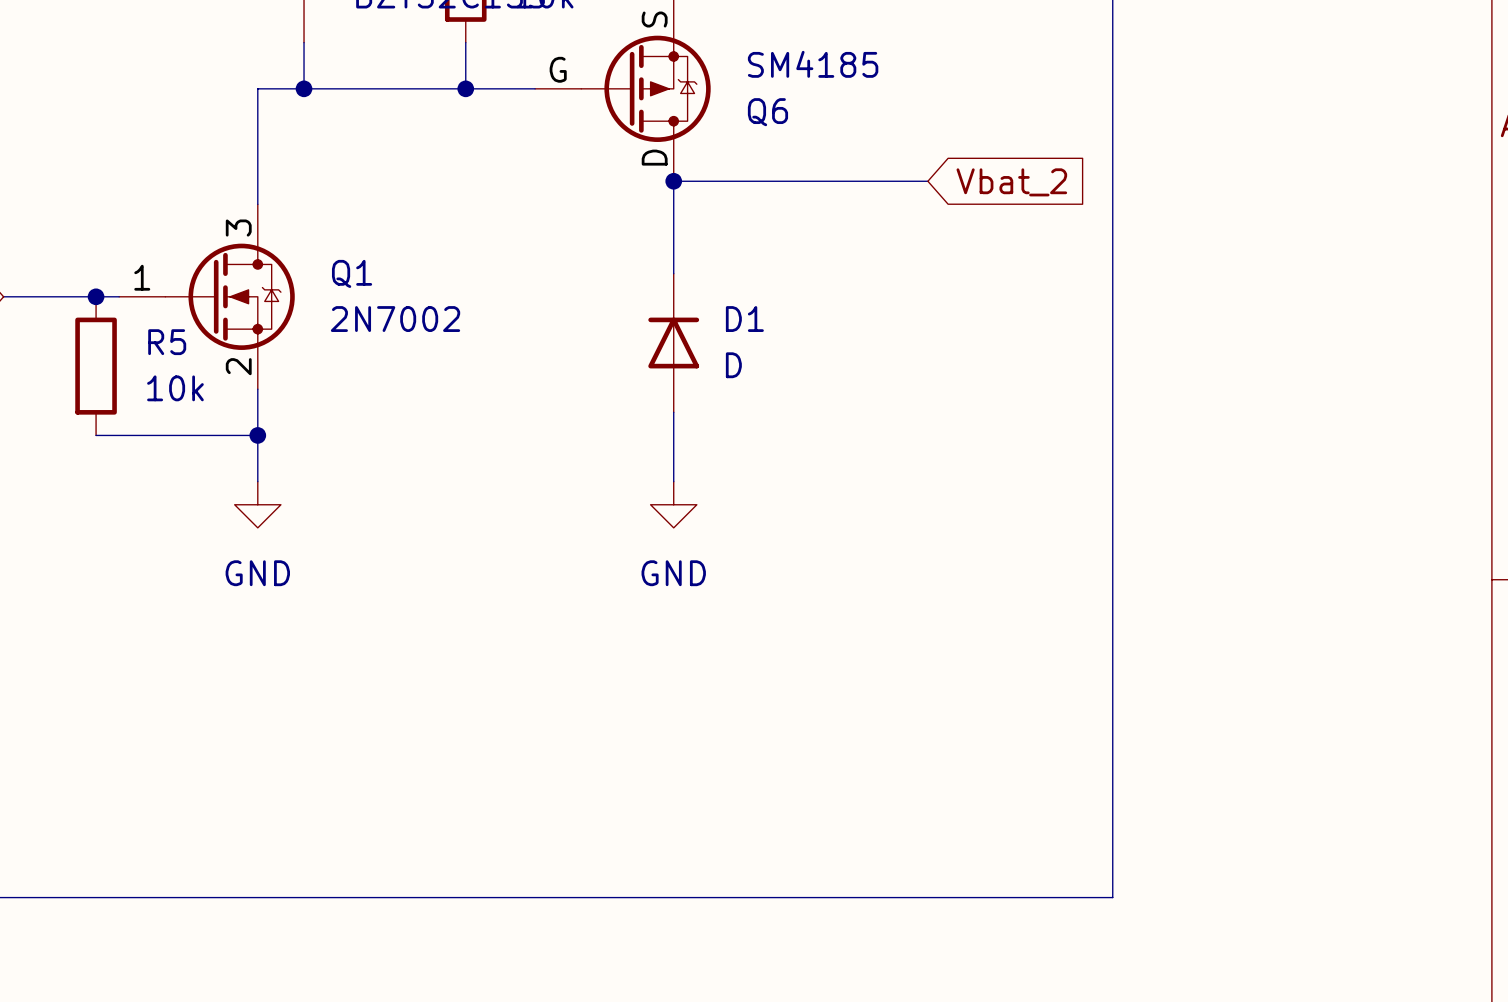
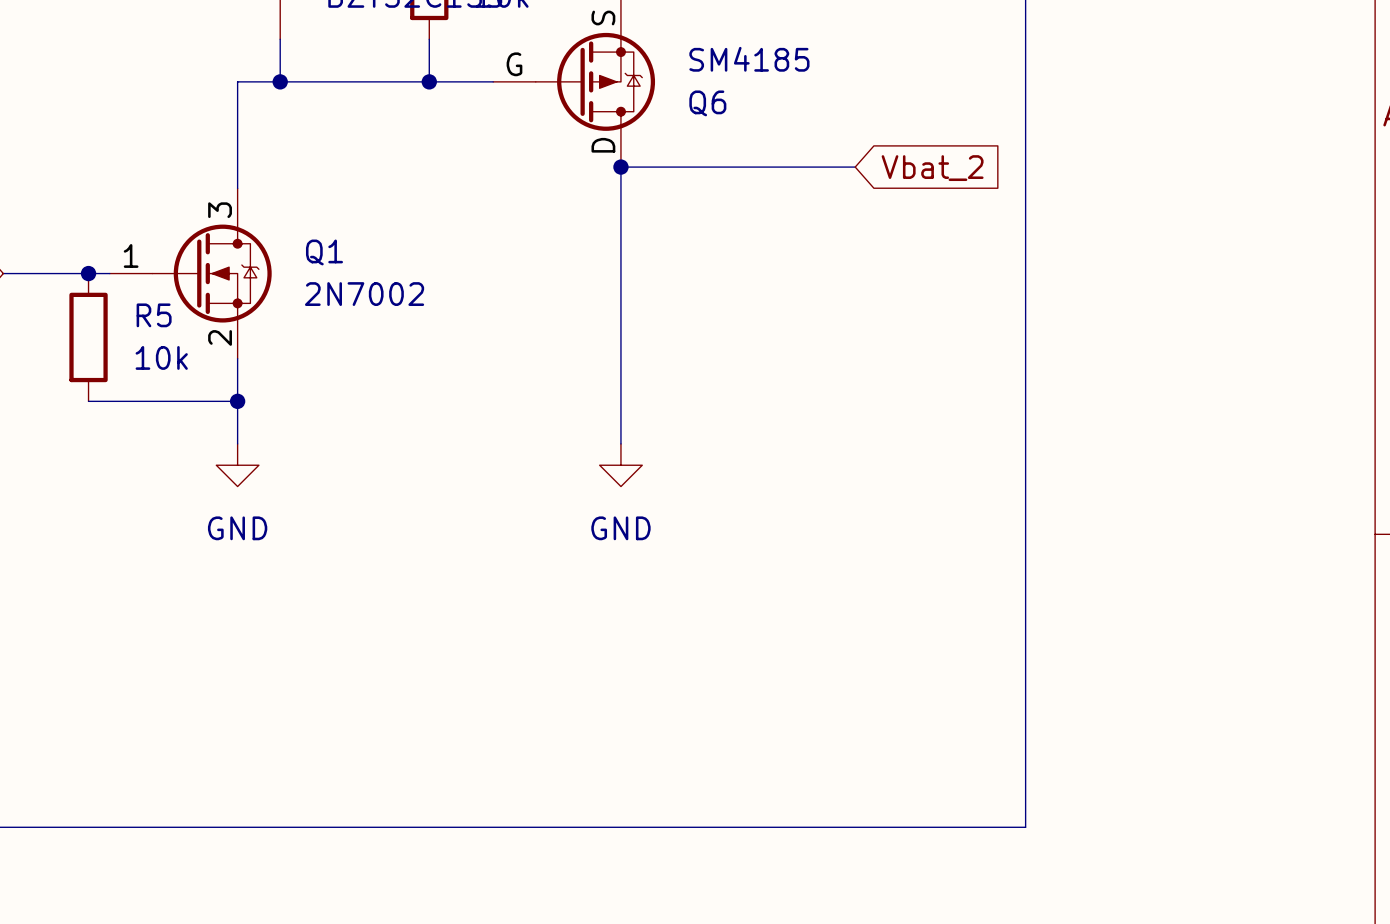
D1: D (673, 343) -> none

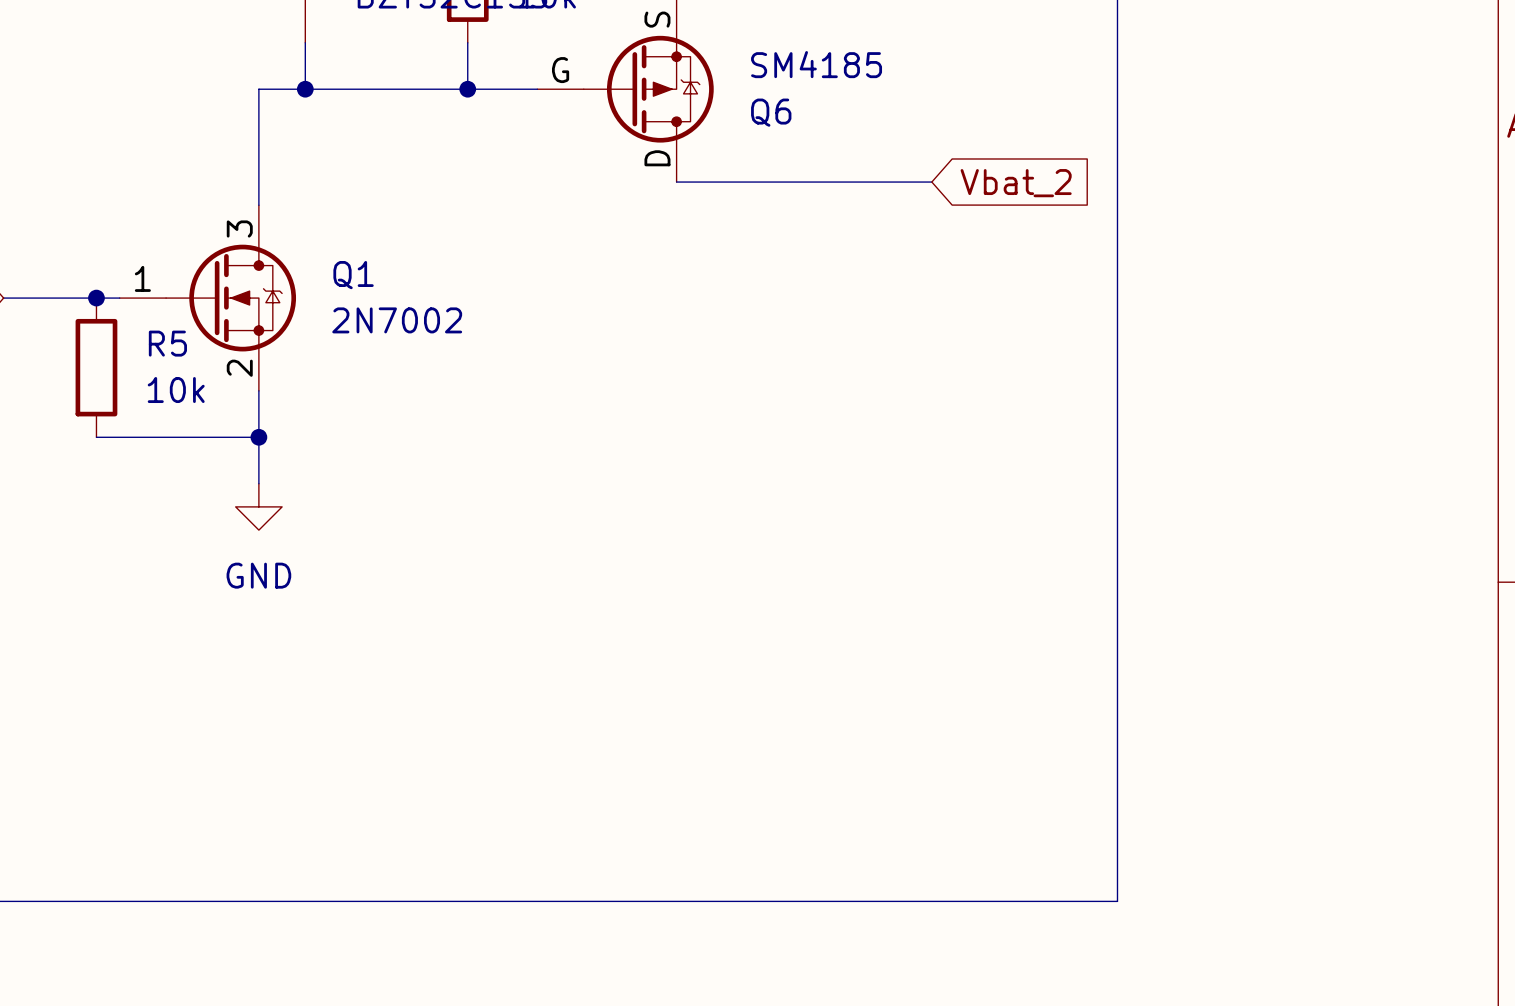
wire: (620, 167) (620, 443) -> none
junction: (620, 167) -> none
power symbol: GND (620, 465) -> none

